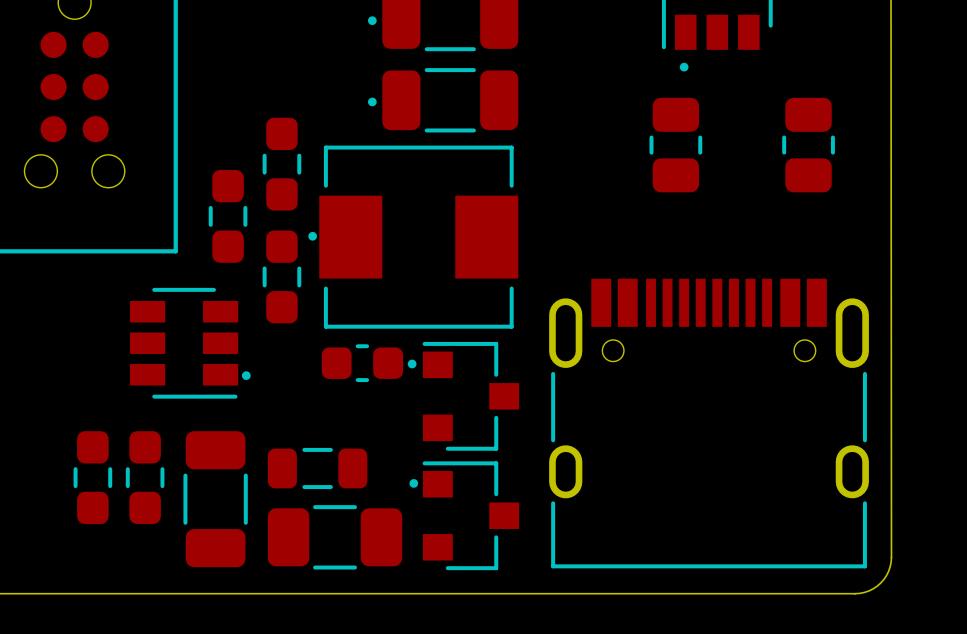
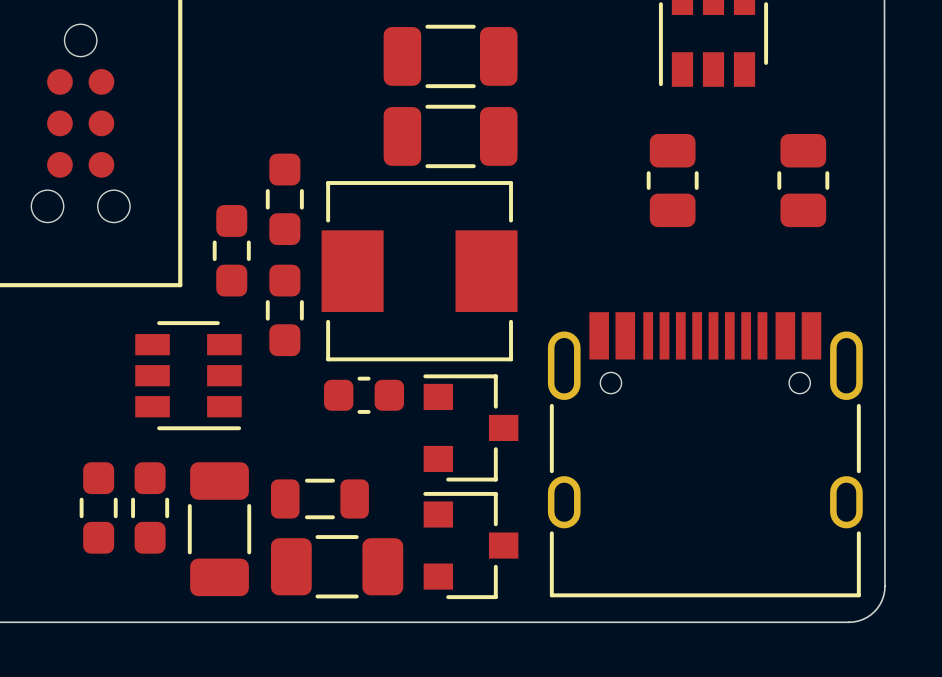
drawing: [368, 16, 377, 26] -> none
drawing: [679, 62, 689, 72] -> none
drawing: [368, 97, 377, 107] -> none
drawing: [308, 231, 317, 241] -> none
drawing: [407, 359, 417, 369] -> none
drawing: [241, 371, 251, 380] -> none
drawing: [409, 479, 419, 488] -> none

